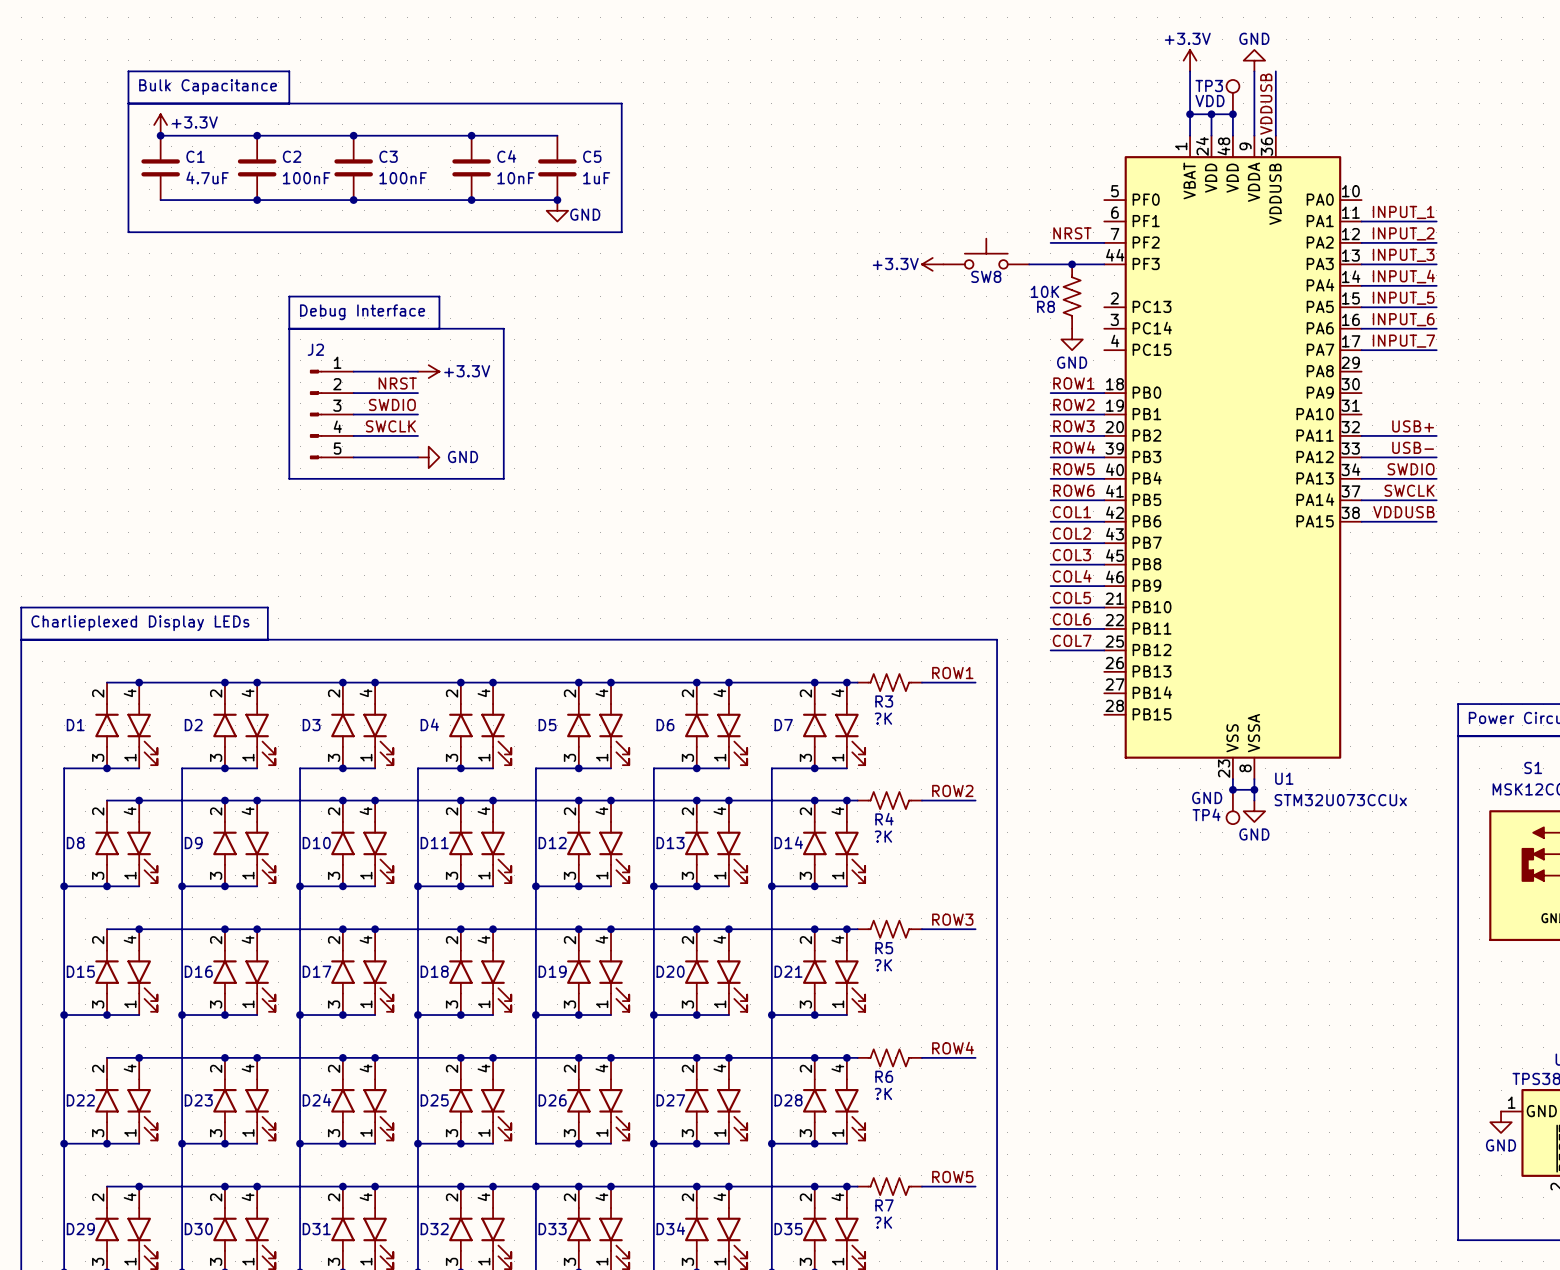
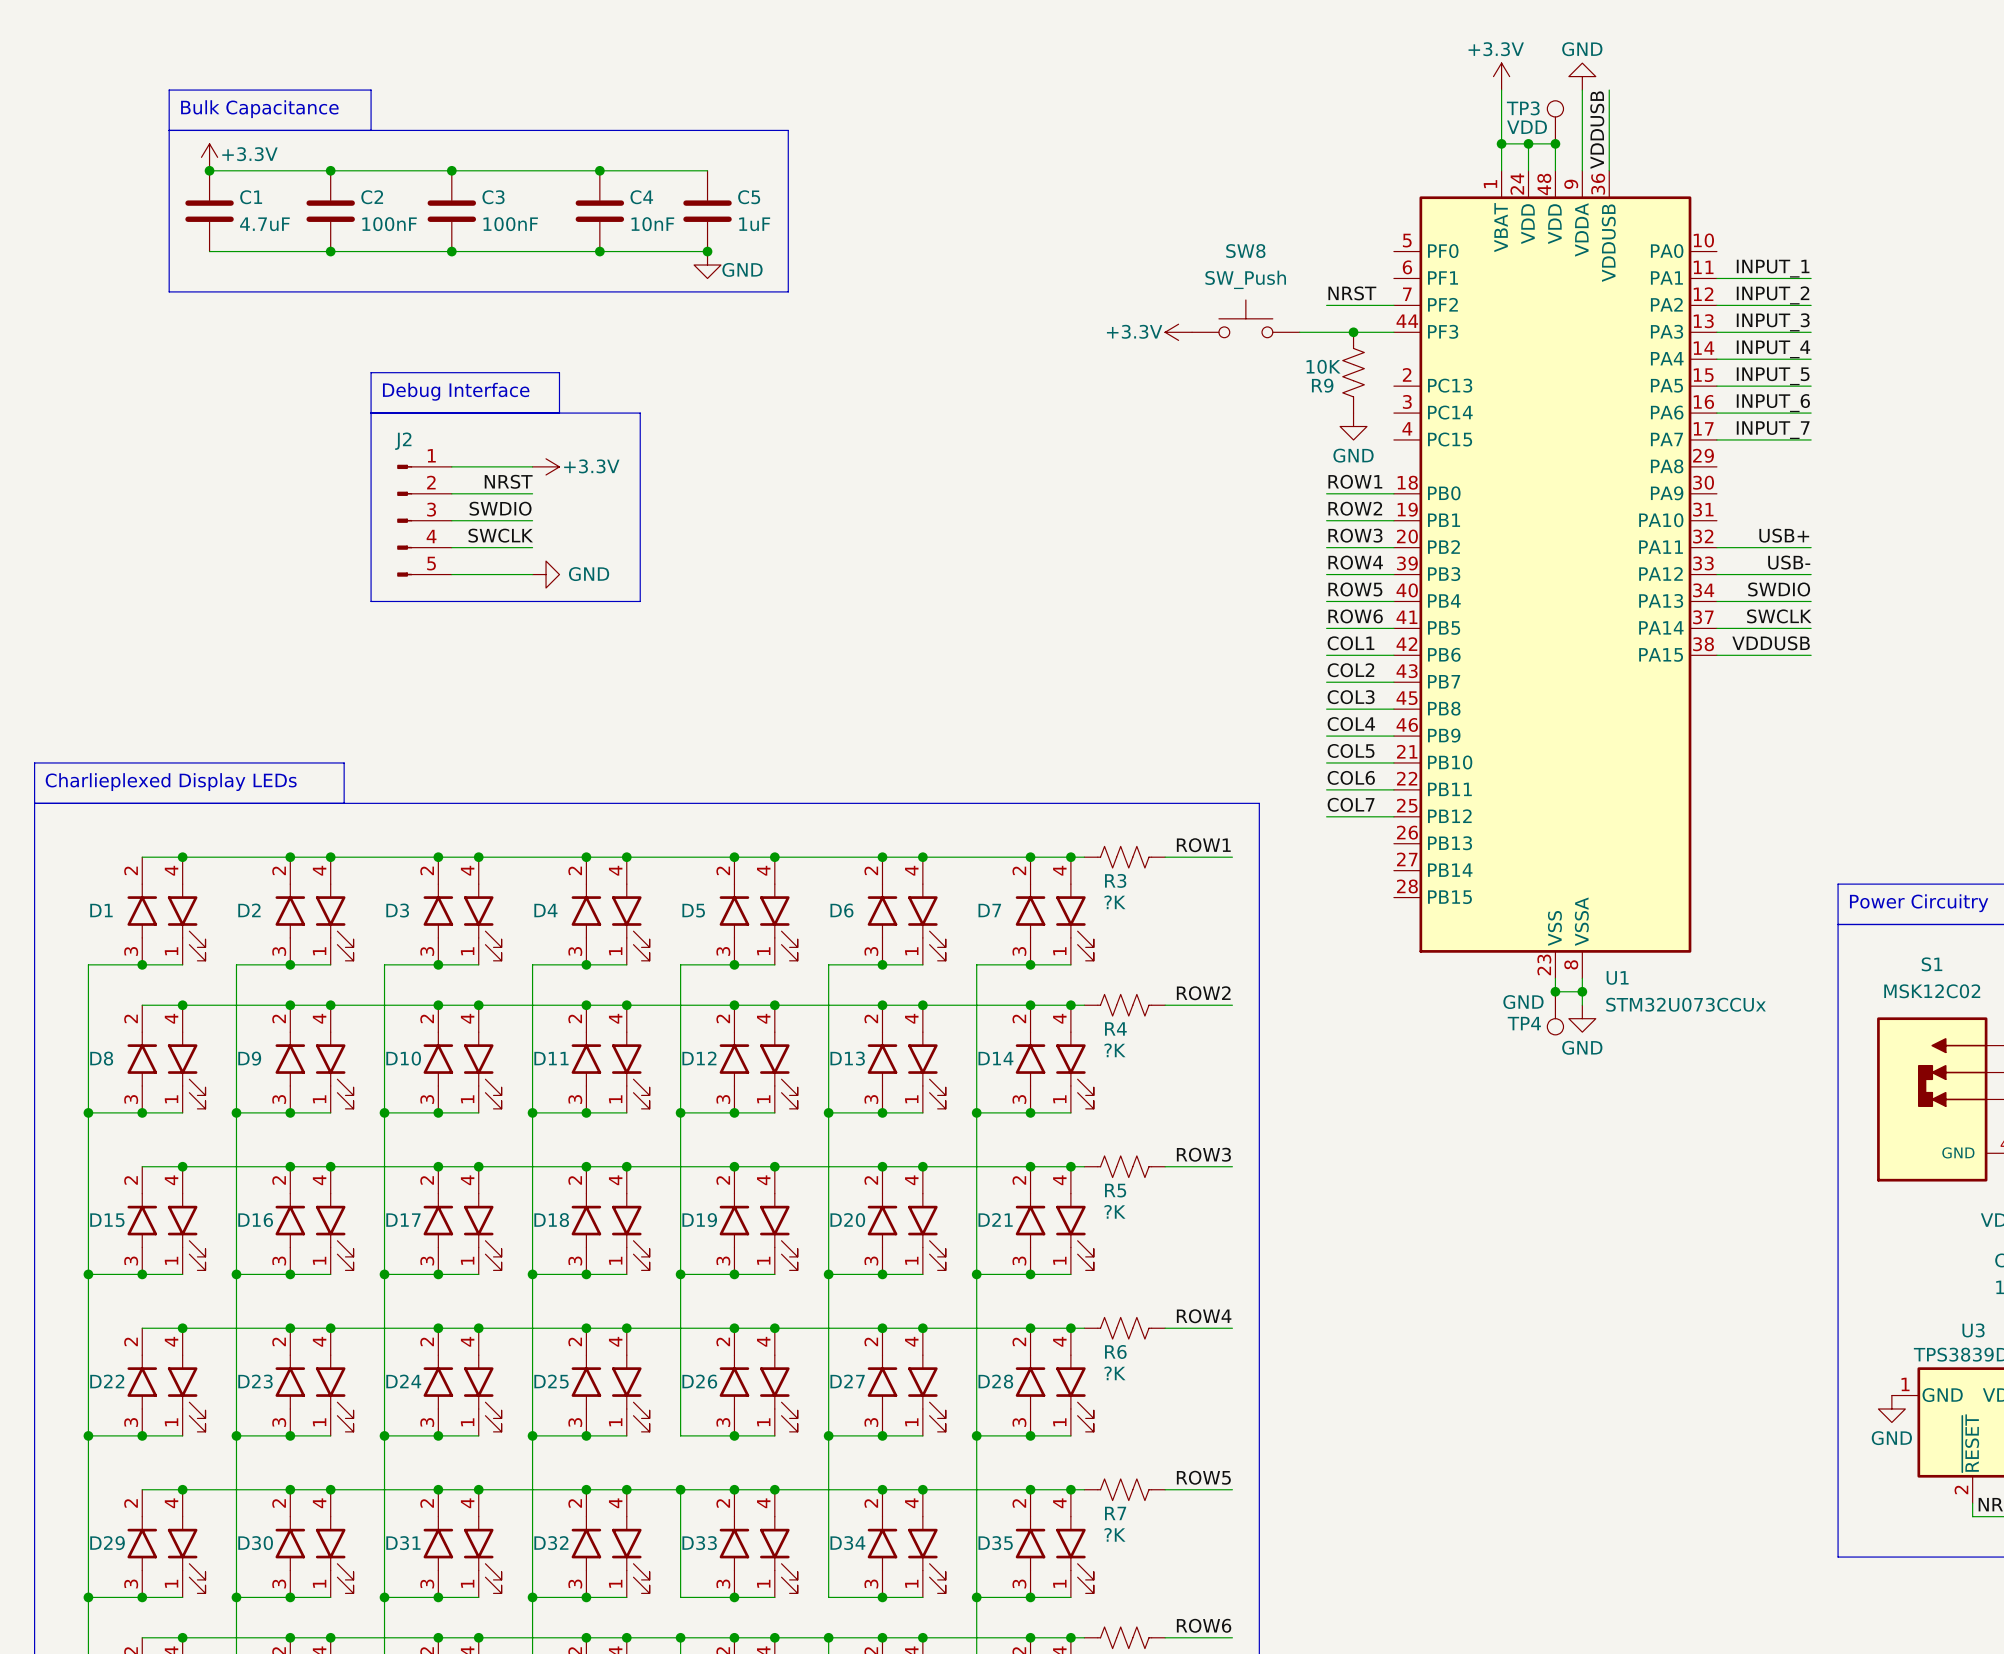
SW8 value: none -> SW_Push (1245, 279)
SW8 name position: SW8 (986, 276) -> SW8 (1245, 251)
R8 name: R8 (1046, 306) -> R9 (1322, 385)

